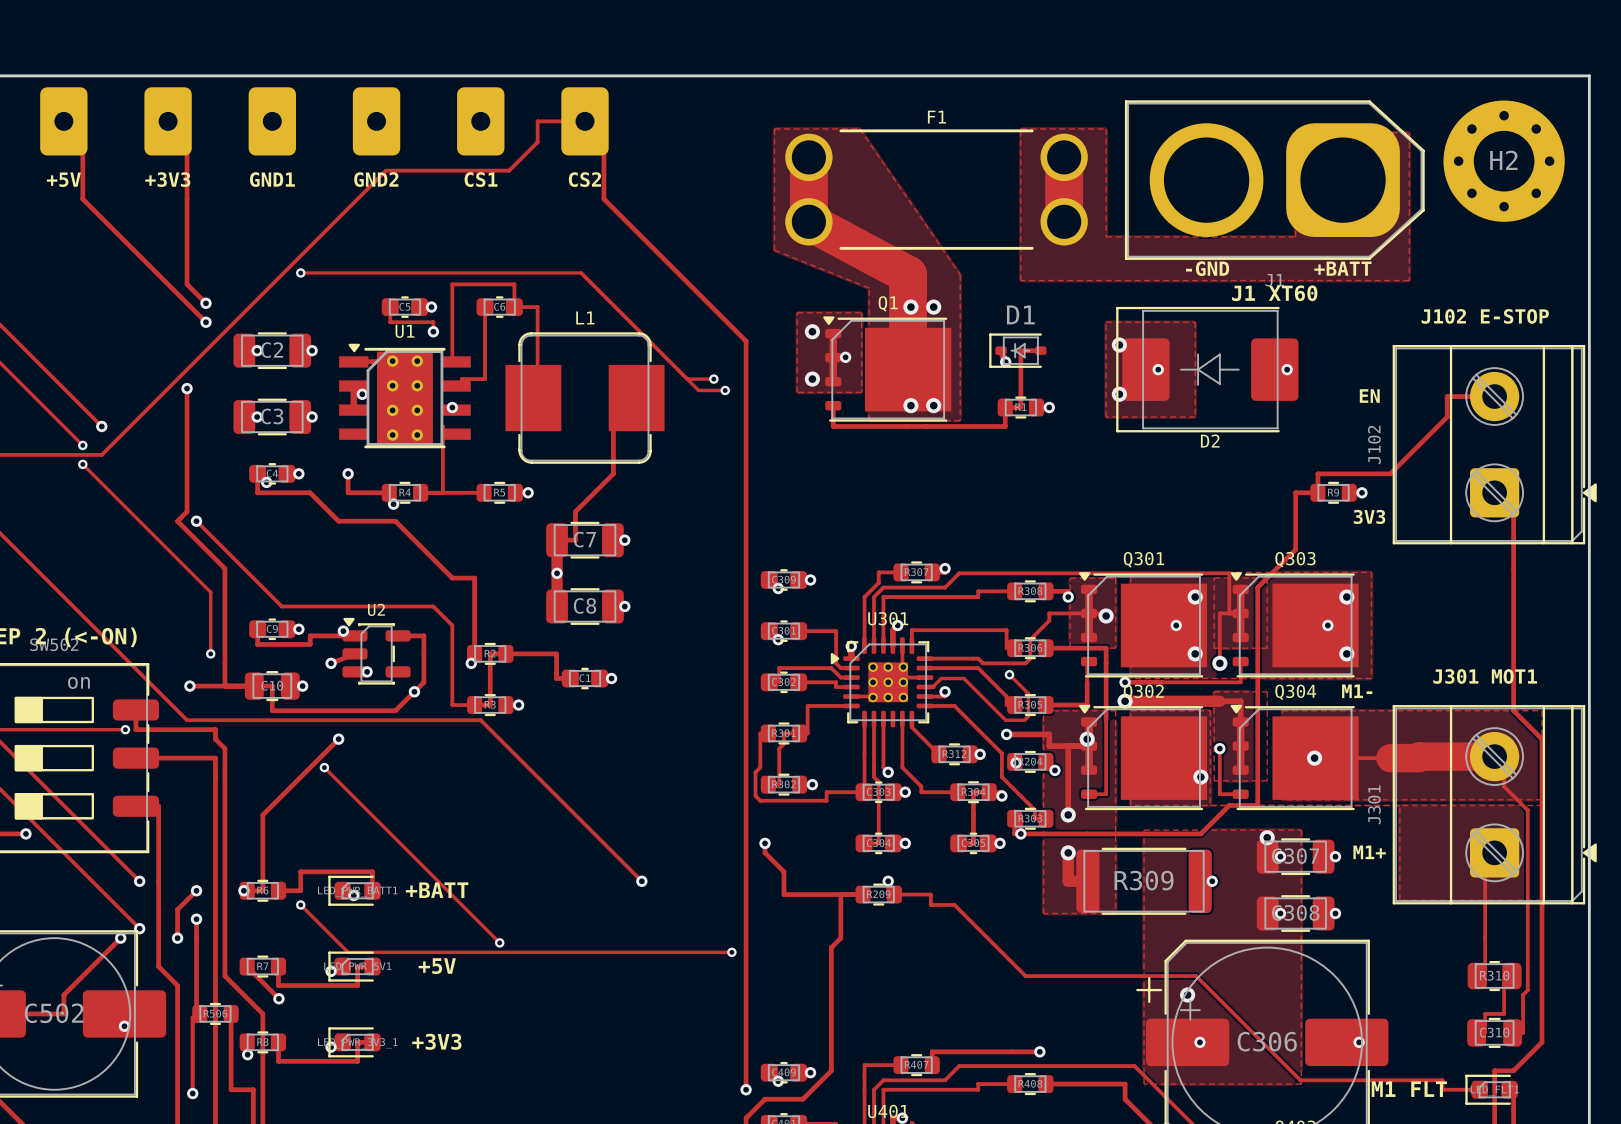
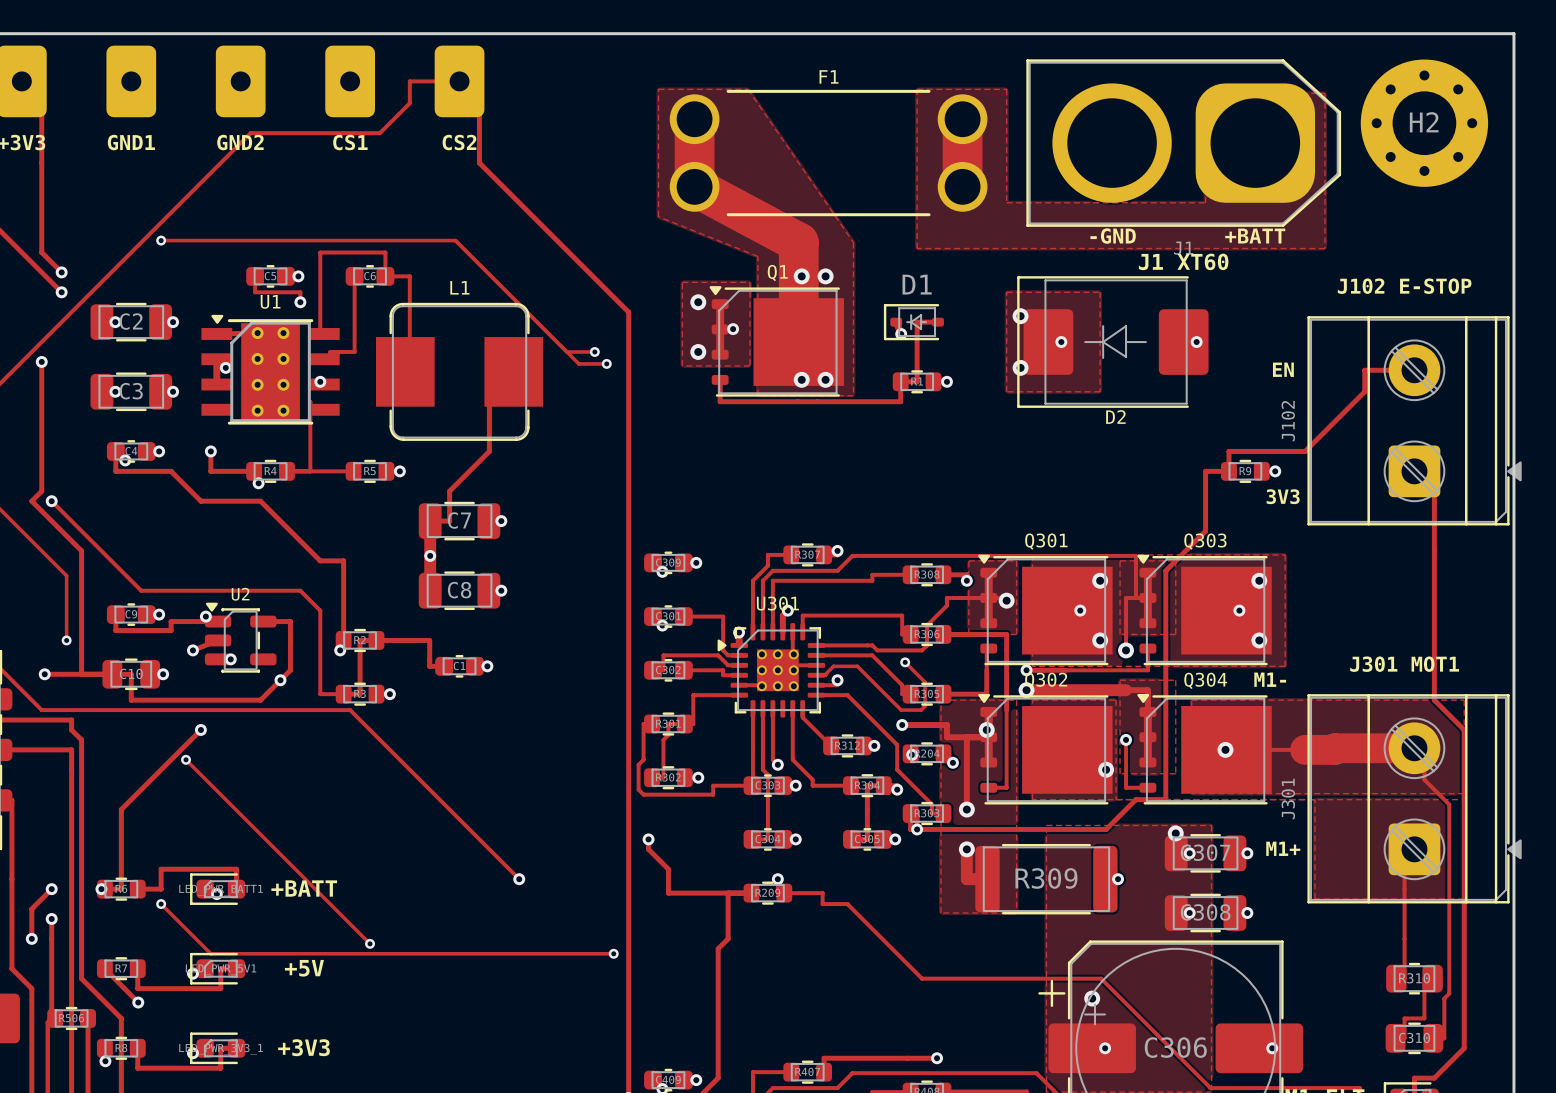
J102 footprint: [1392, 344, 1597, 545] -> [1307, 316, 1522, 526]
J301 footprint: [1392, 705, 1597, 905] -> [1307, 694, 1522, 904]

